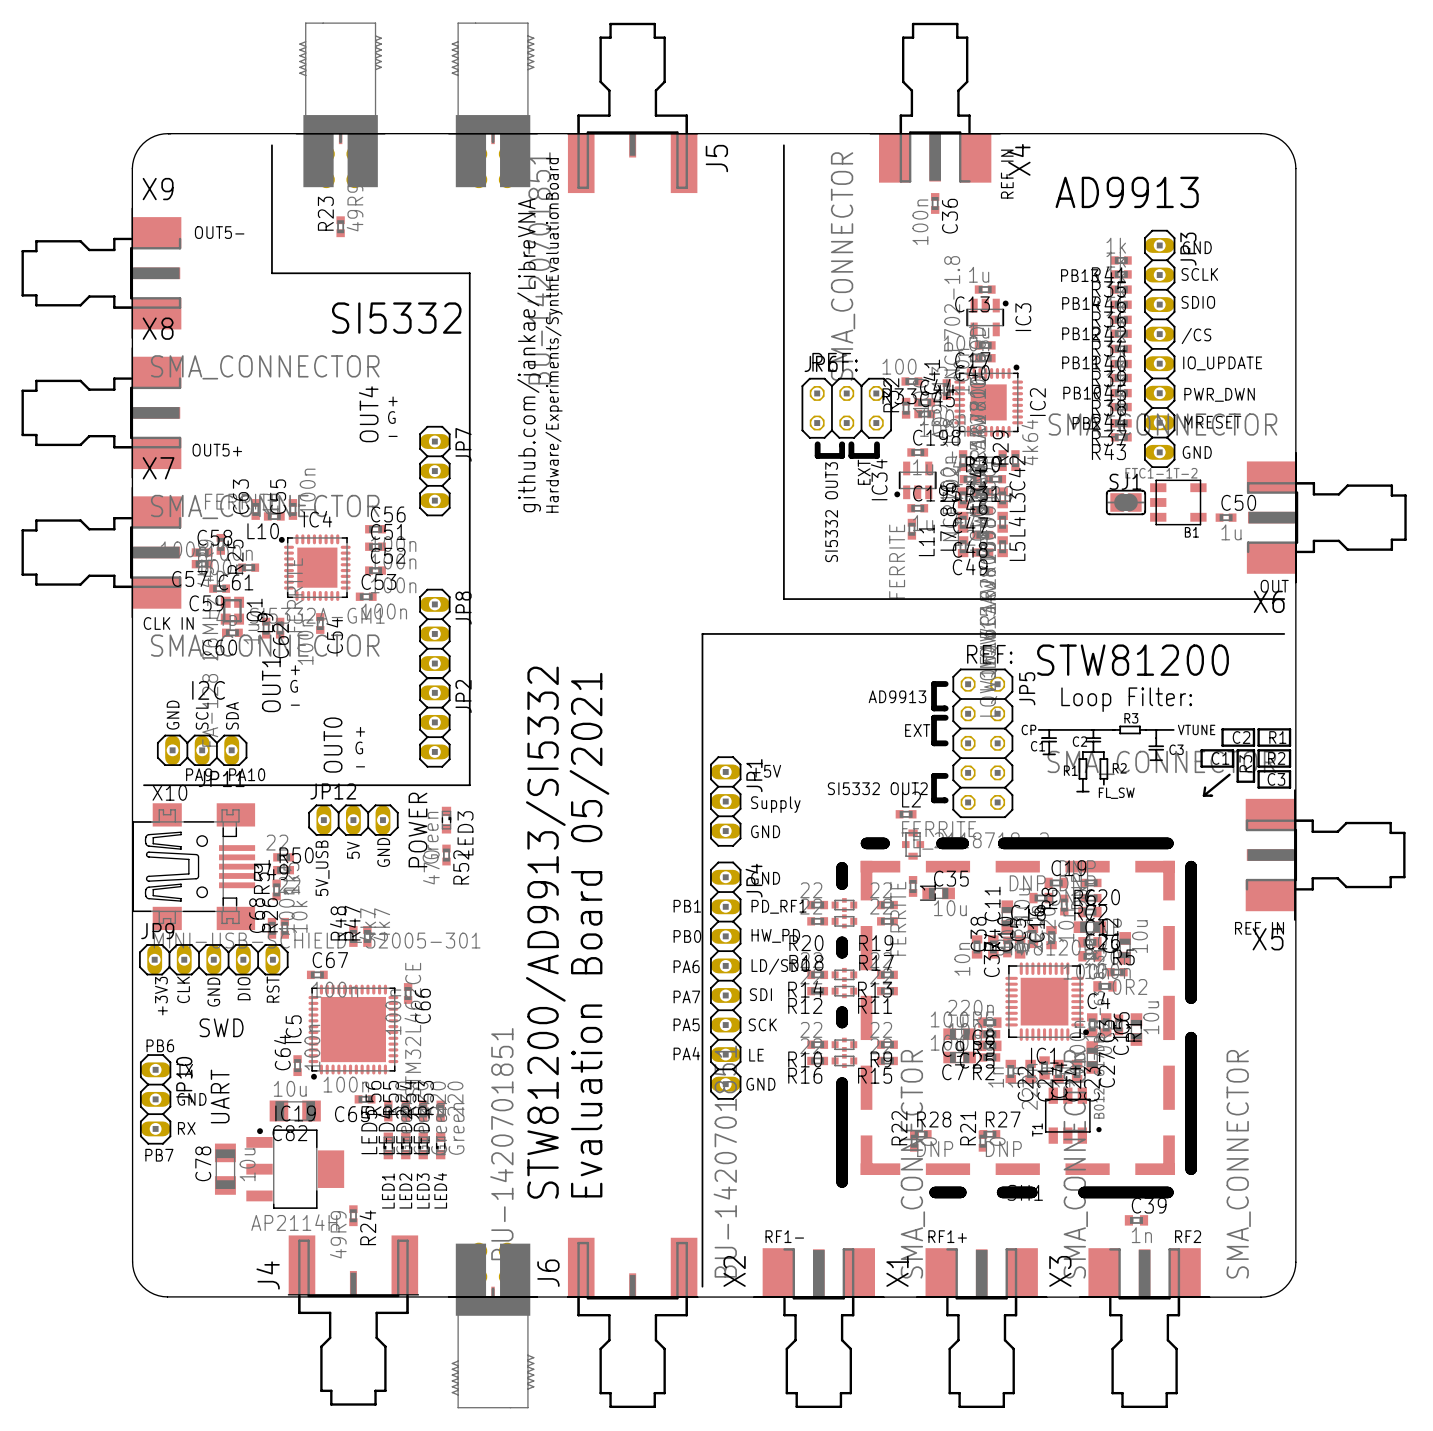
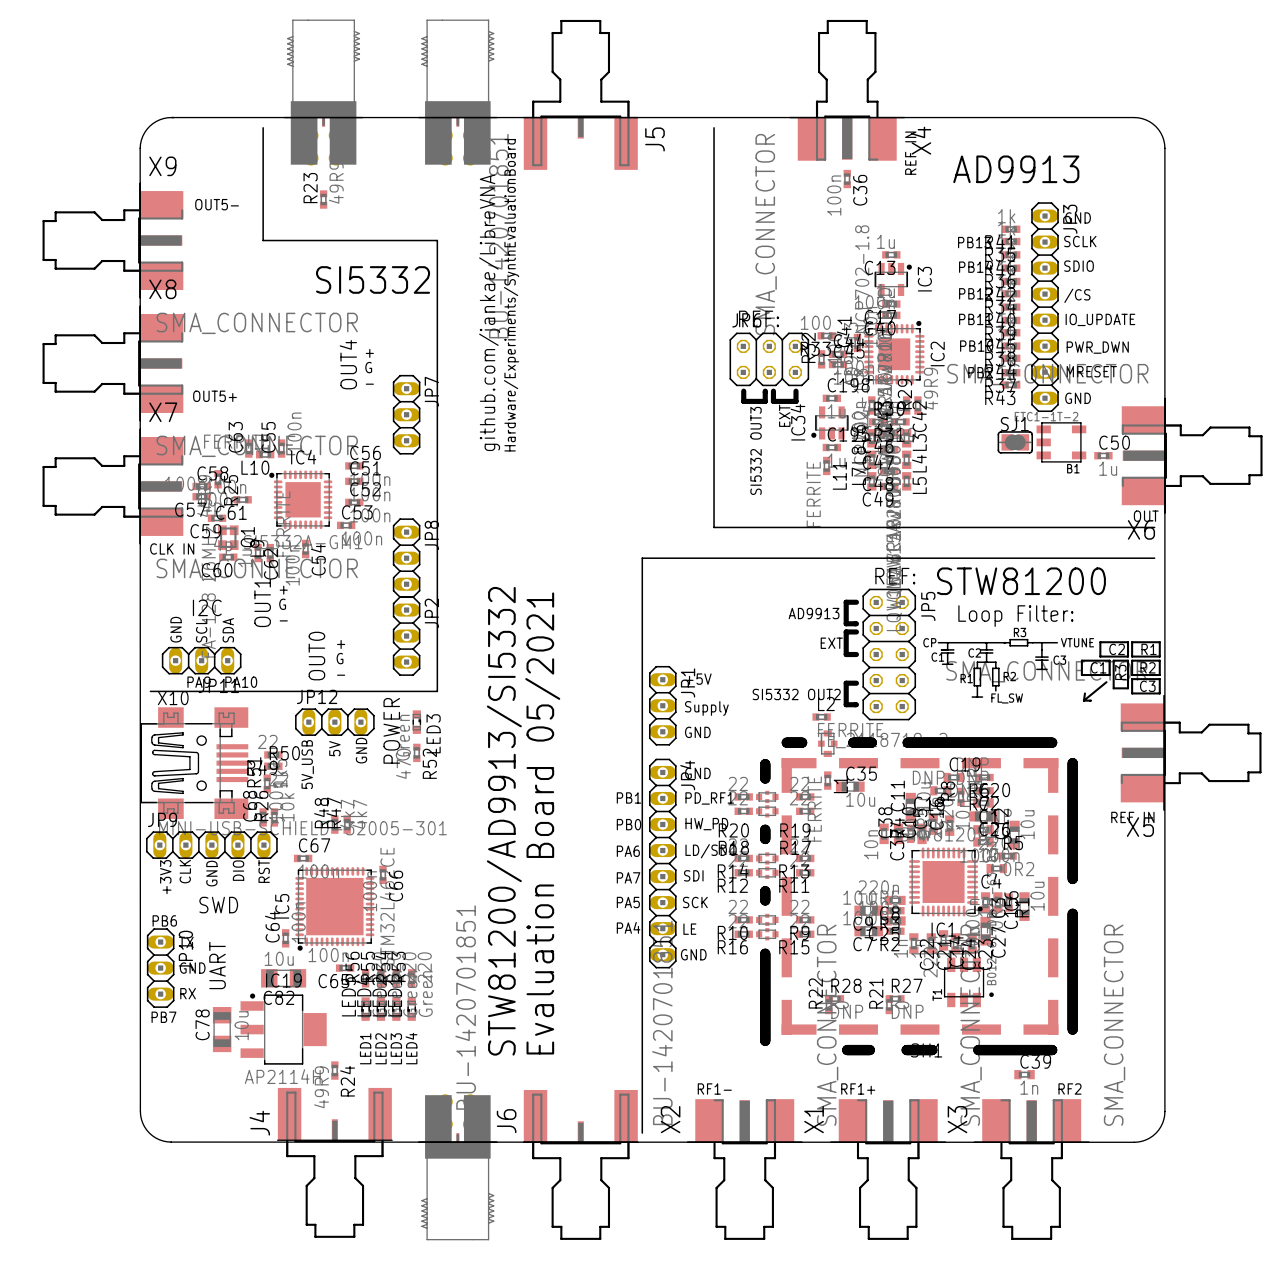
R29 value: 4k64 (1029, 442) -> 49R9 (930, 388)

